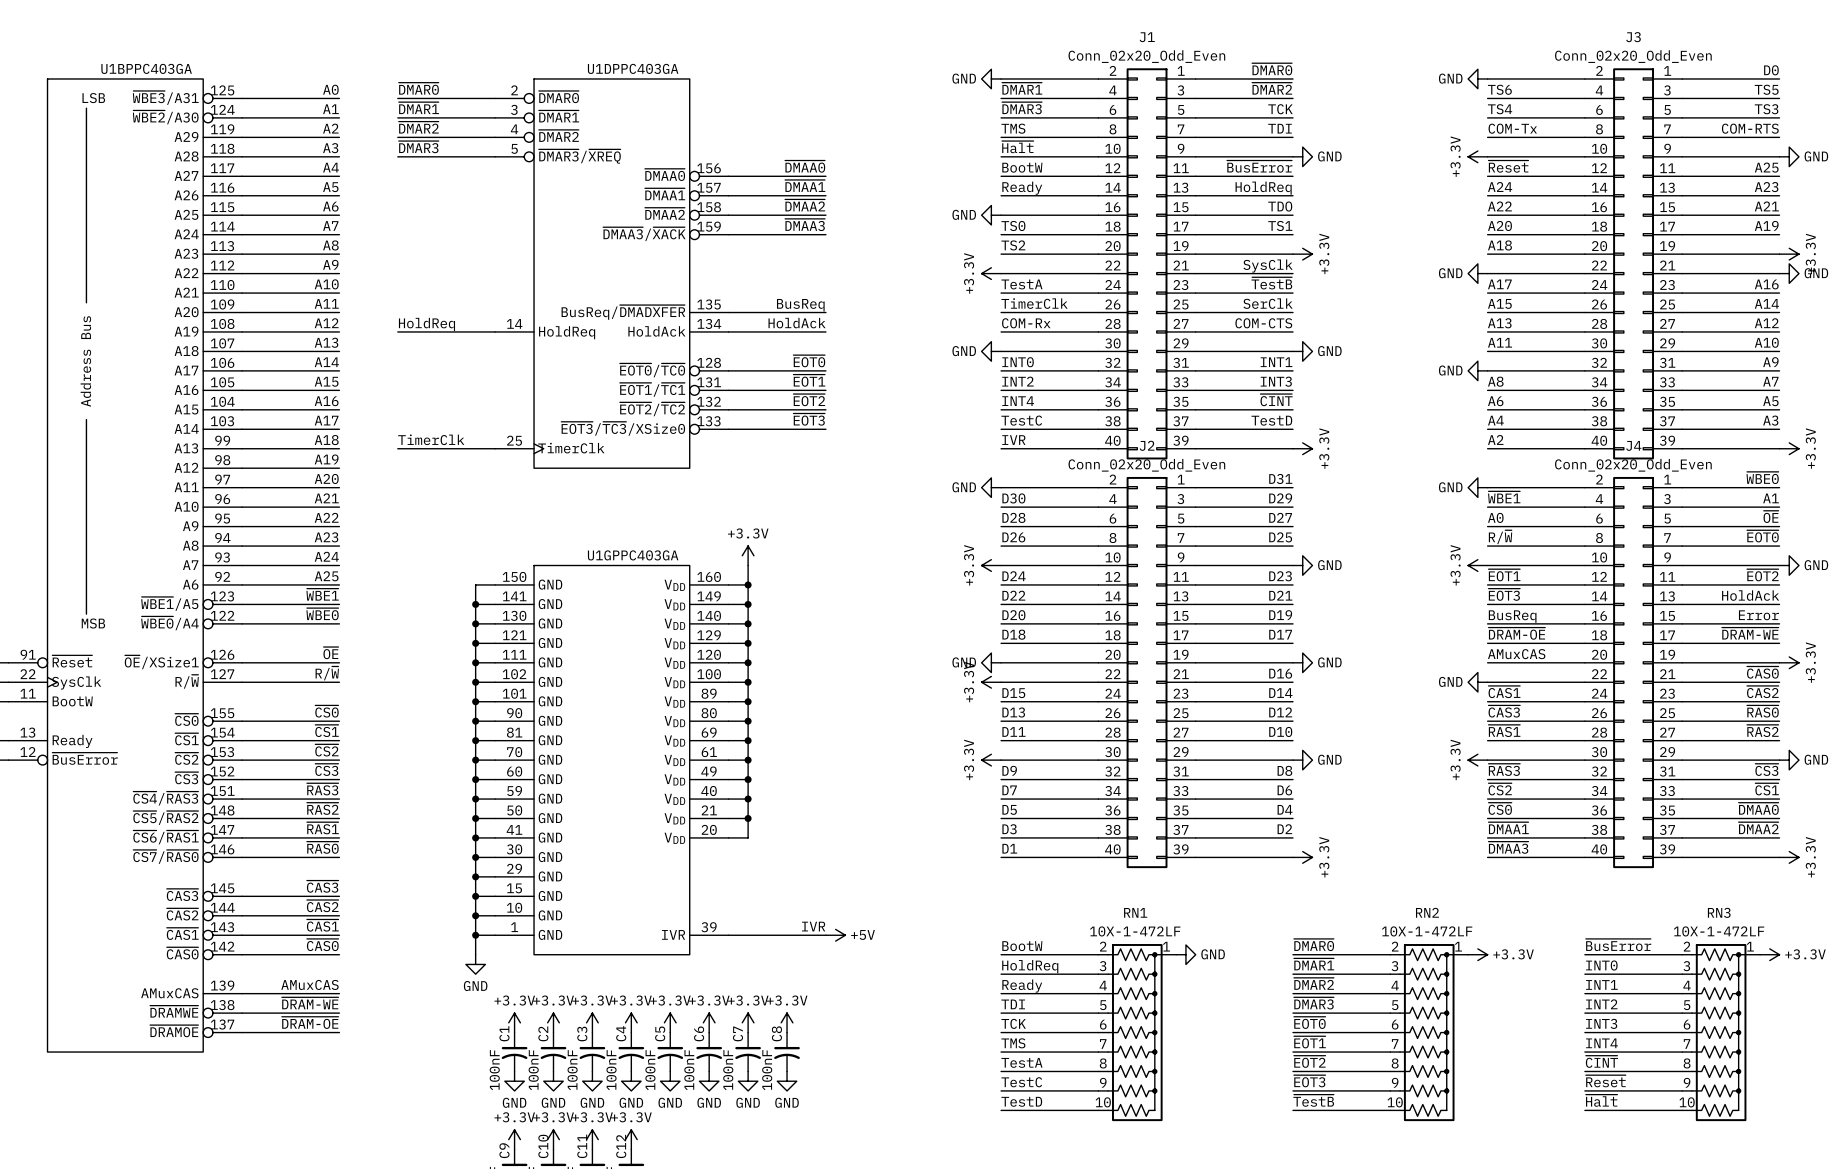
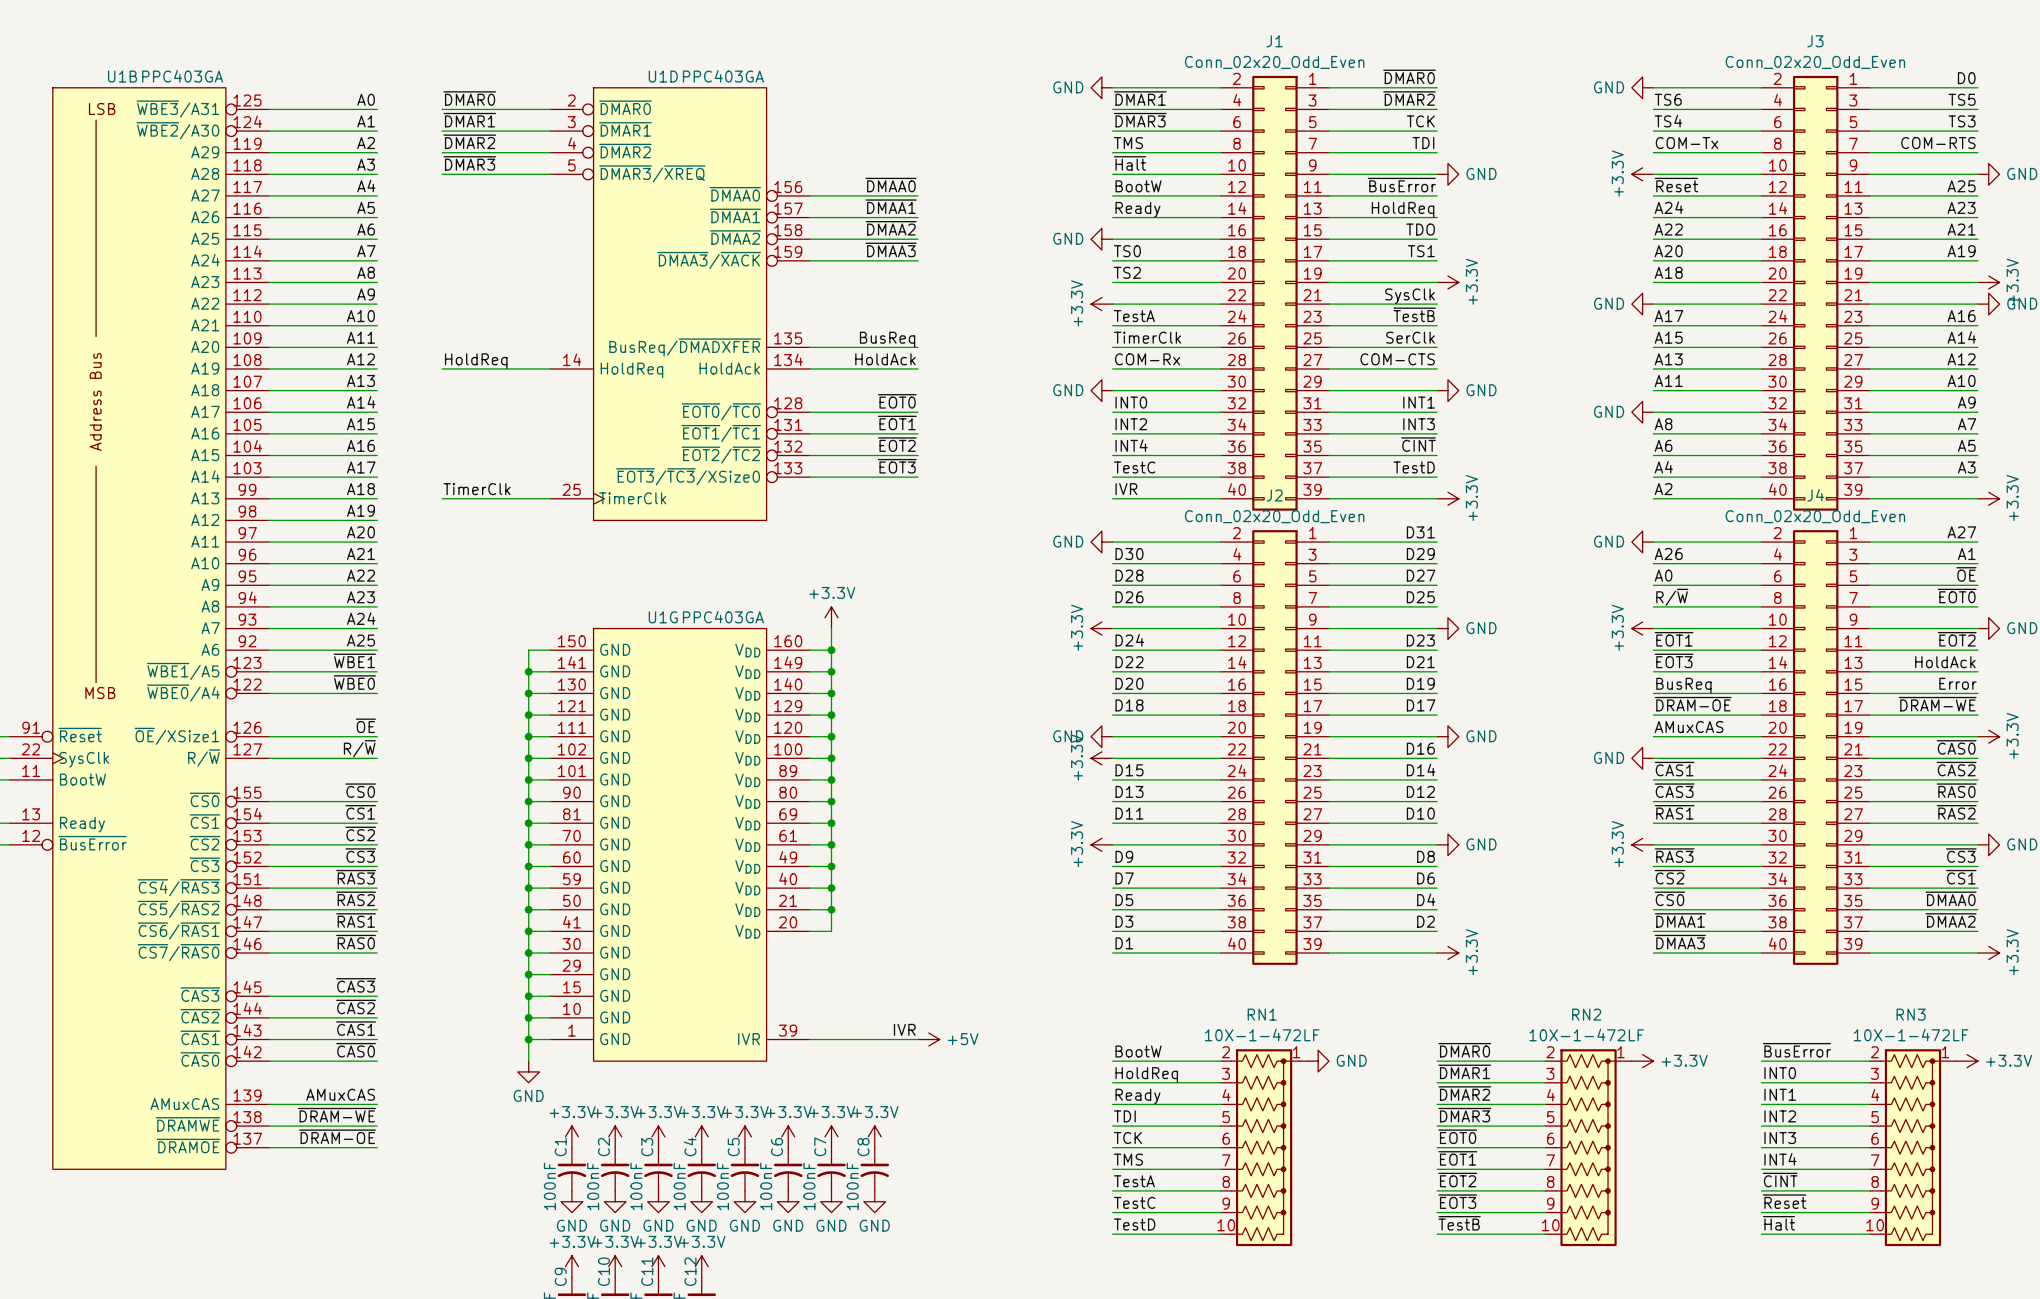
label: ~{WBE0} (1762, 477) -> A27 (1961, 532)
label: ~{WBE1} (1504, 497) -> A26 (1668, 554)

